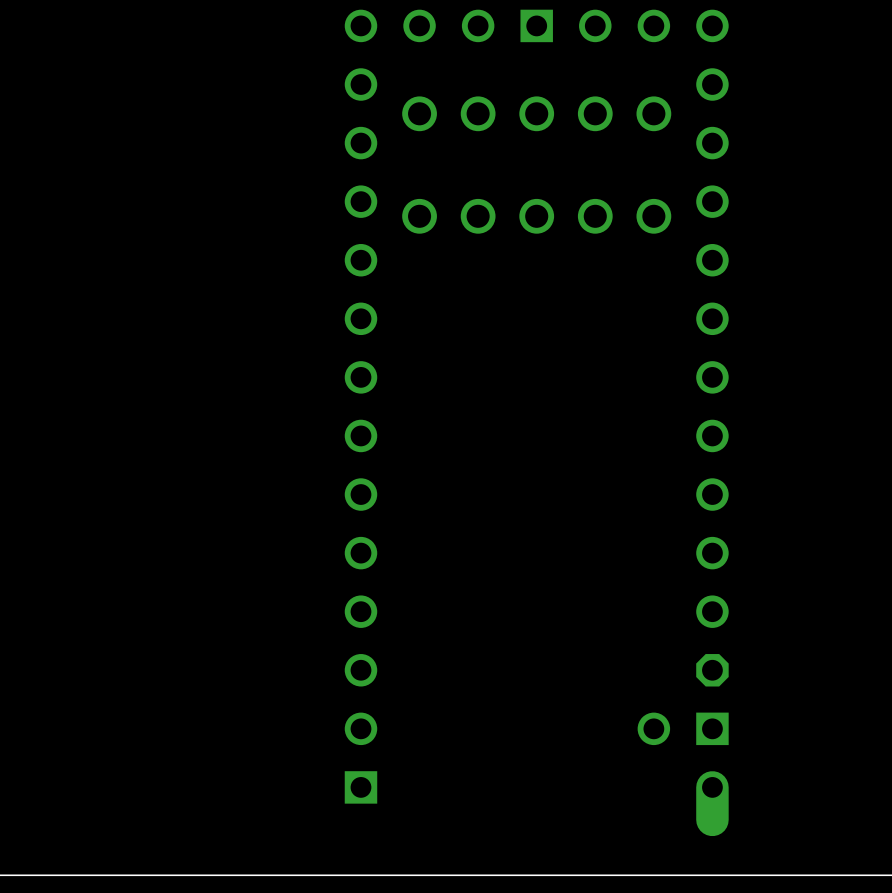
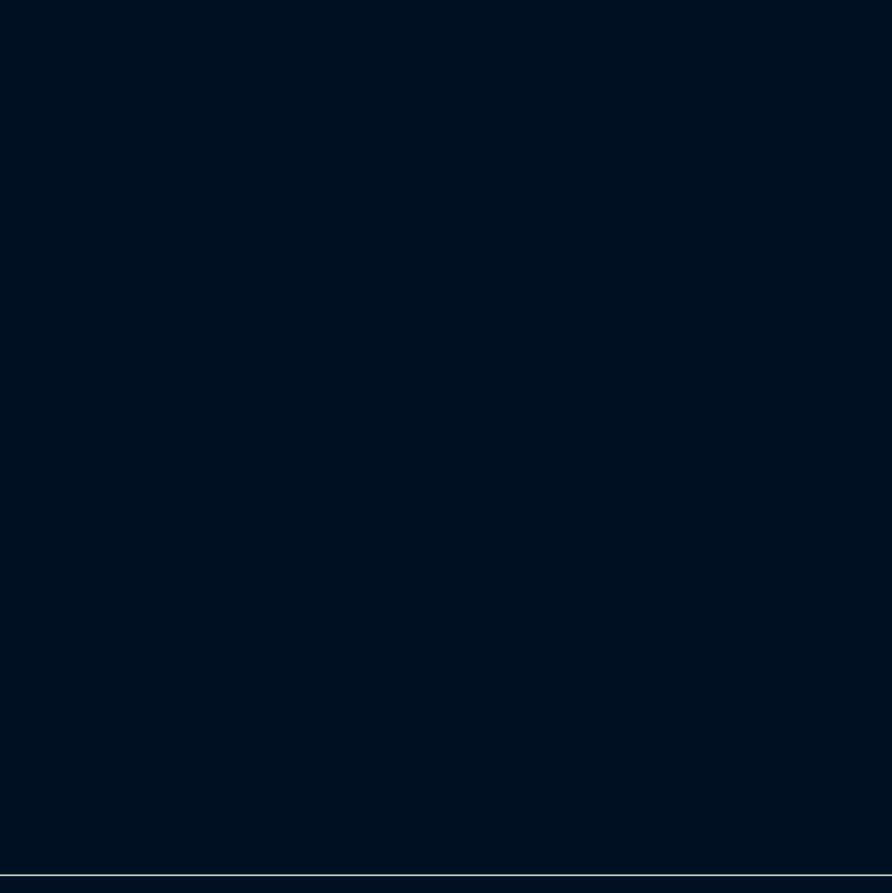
part: (536, 422) -> none

